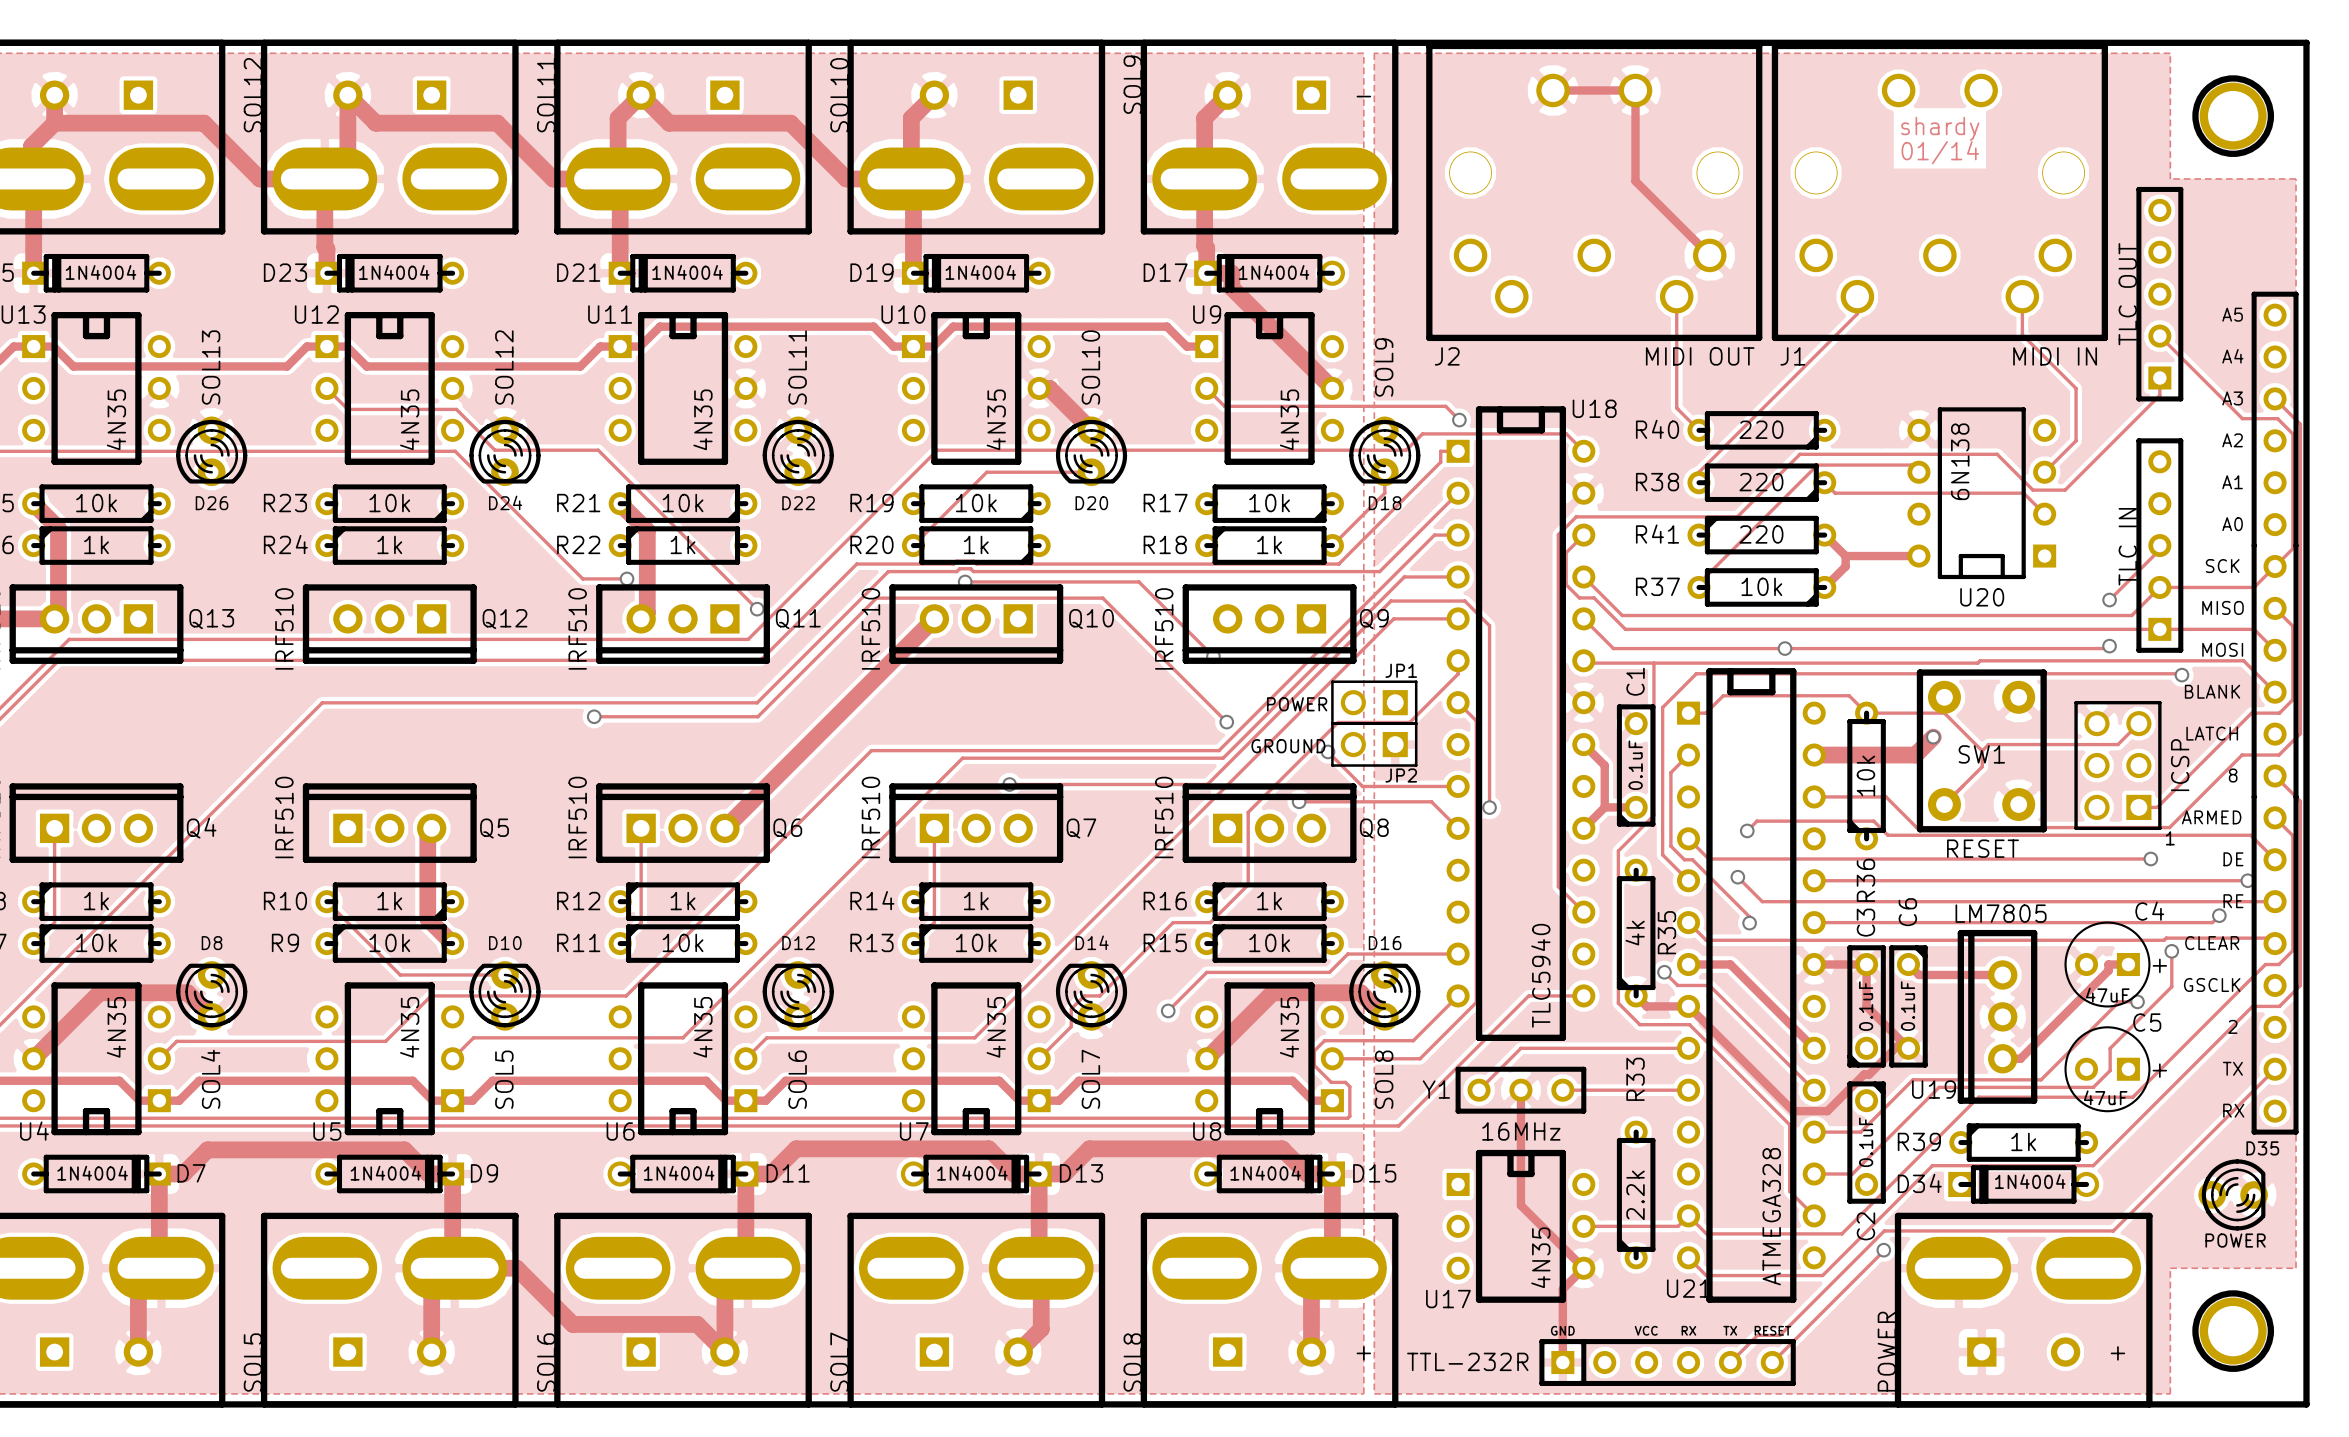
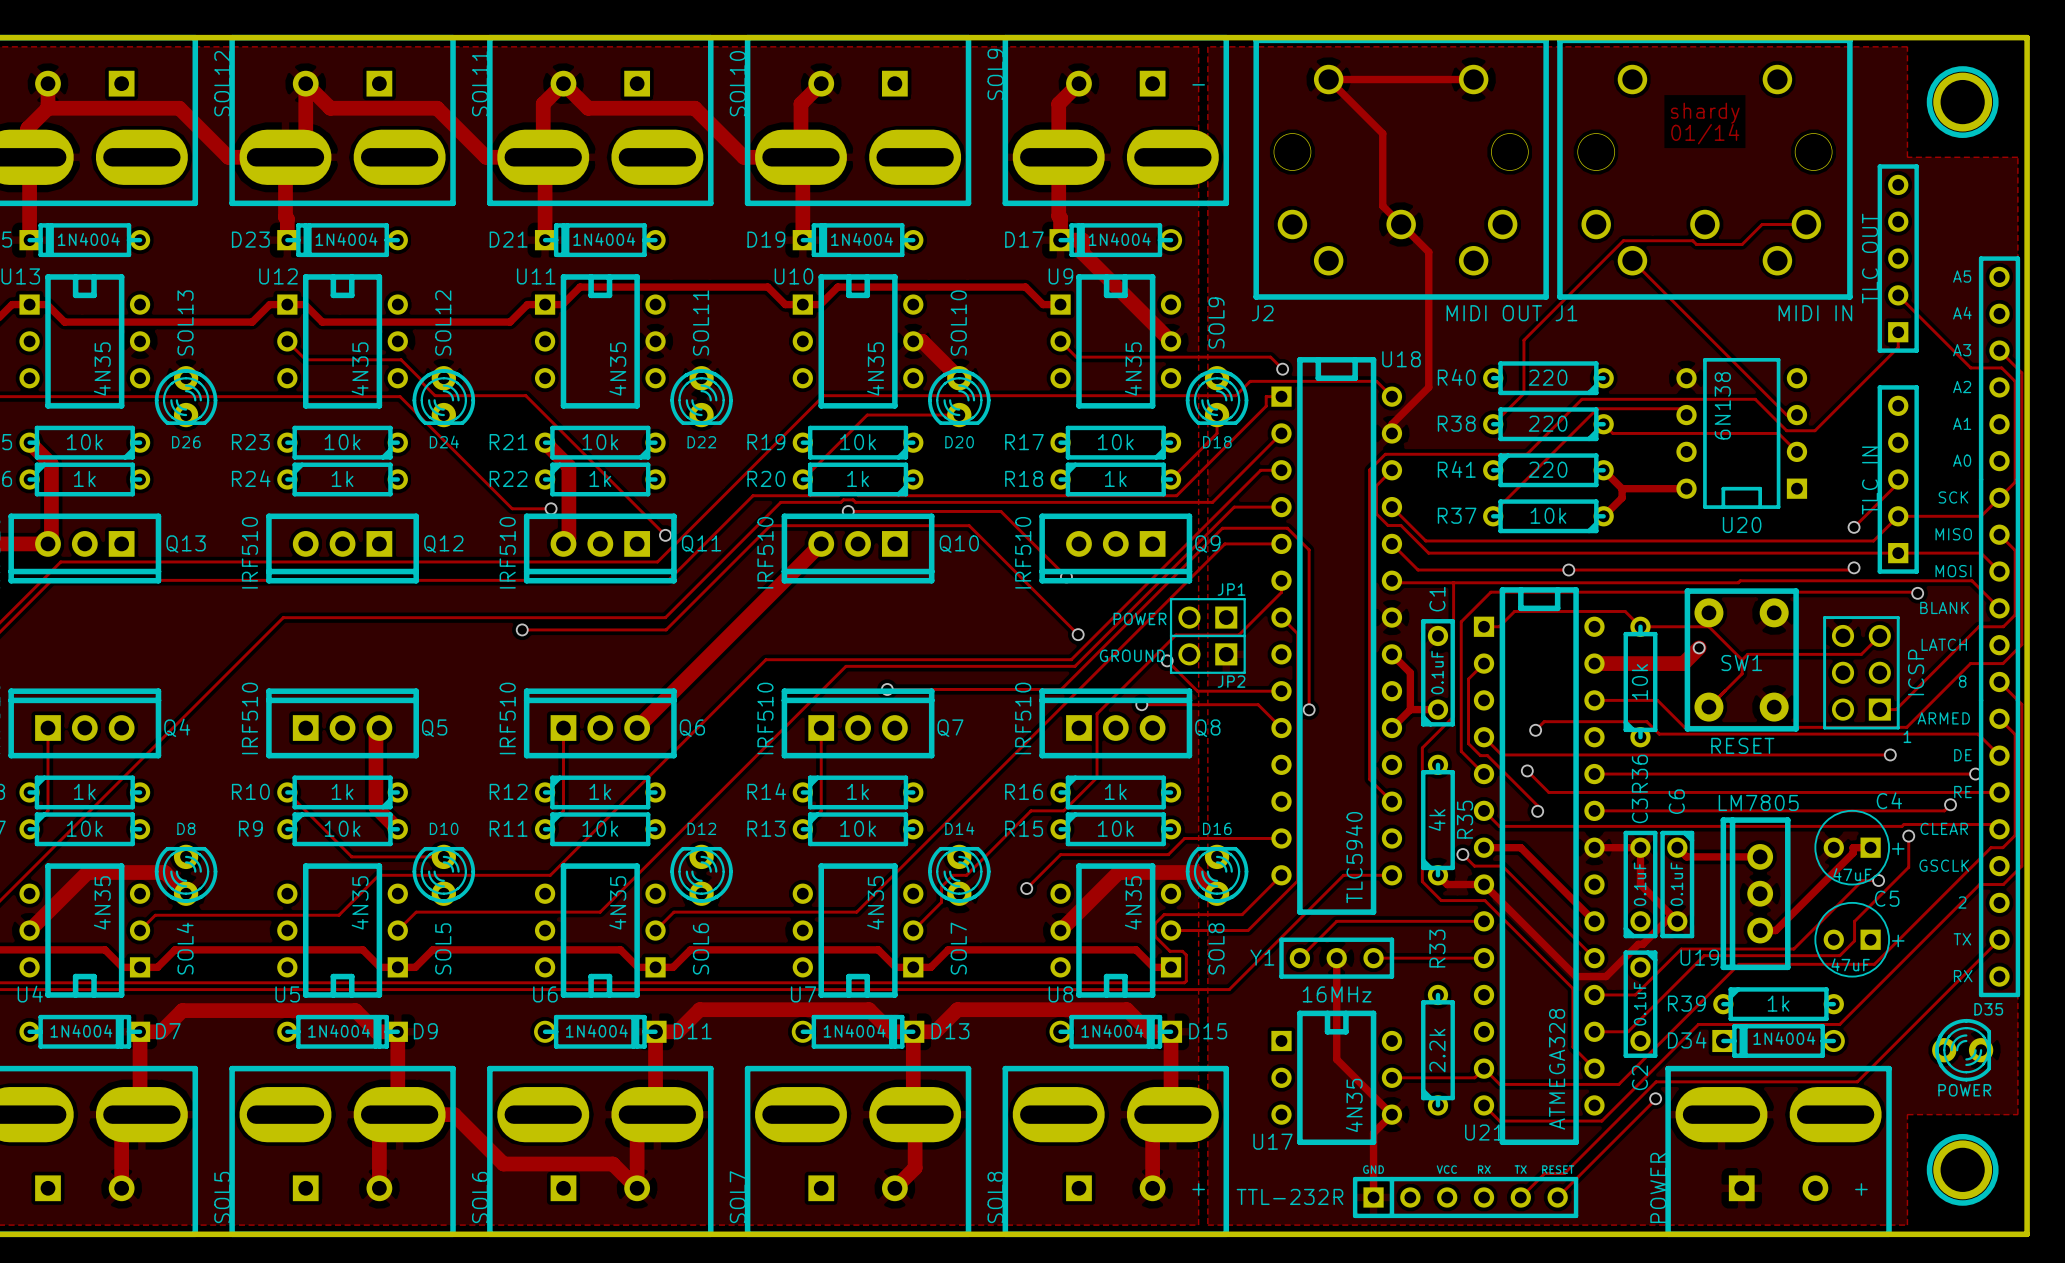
J2 footprint: [1426, 42, 1763, 342] -> [1253, 37, 1549, 300]
J1 footprint: [1771, 42, 2108, 342] -> [1557, 37, 1853, 300]
track: none -> (1364, 79) (1328, 79) (1382, 133) (1382, 206) (1428, 252) (1428, 387) (1391, 424) (1391, 433)
track: (1635, 90) (1635, 181) (1709, 255) -> (1437, 79) (1473, 79)
track: (1676, 296) (1676, 408) (1699, 430) -> none
track: (1857, 296) (1857, 313) (1699, 472) (1699, 482) -> (1806, 224) (1762, 224) (1742, 244) (1696, 244) (1692, 240) (1623, 240) (1523, 340) (1523, 393) (1493, 424)
track: (2022, 296) (2022, 334) (2076, 388) (2076, 440) (2044, 472) -> (1632, 260) (1786, 415) (1796, 415)

